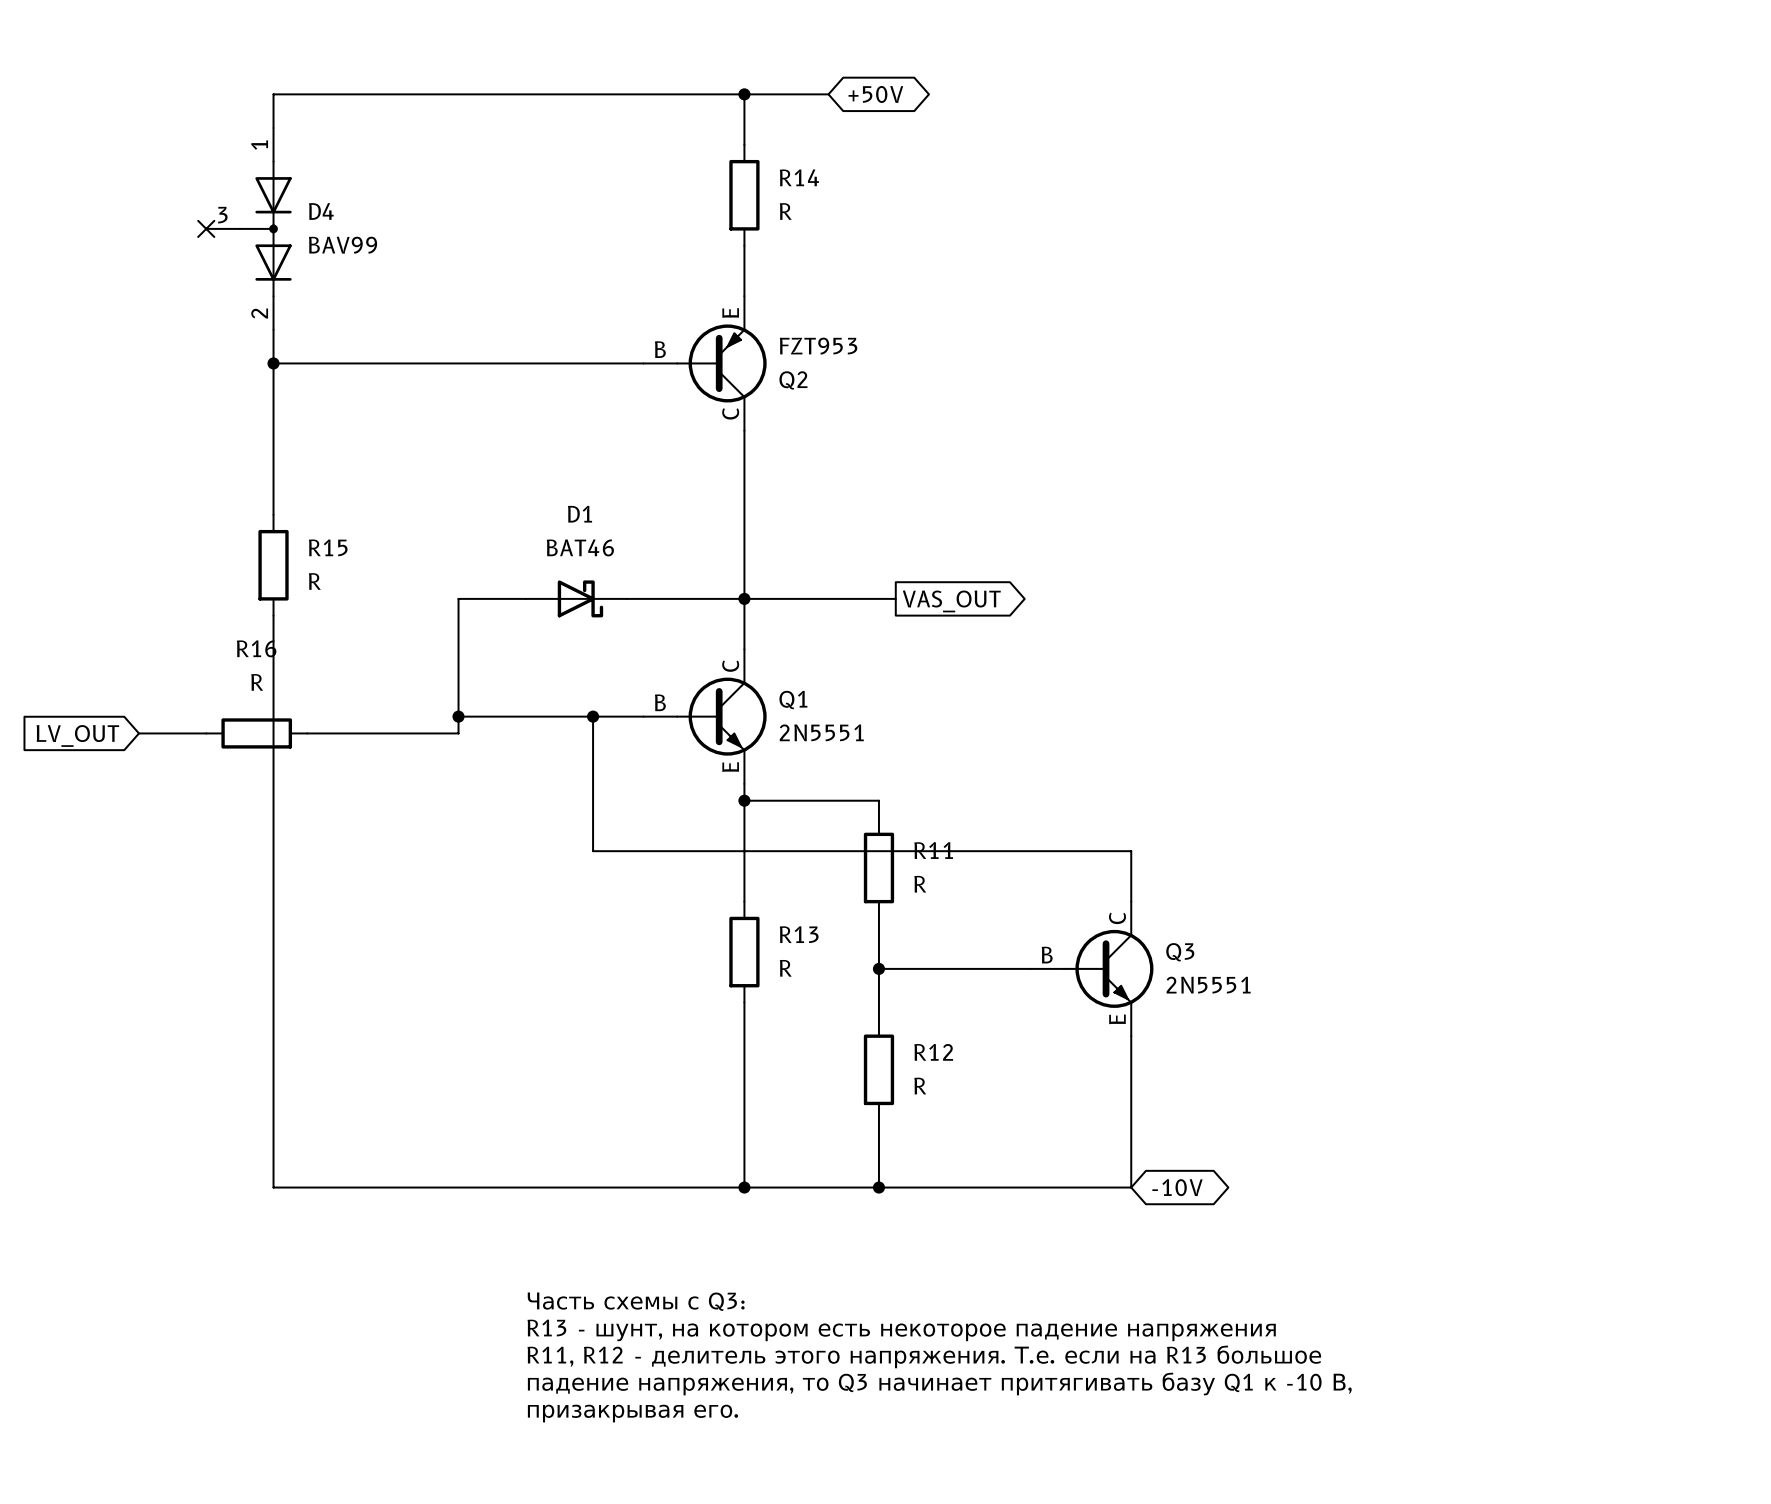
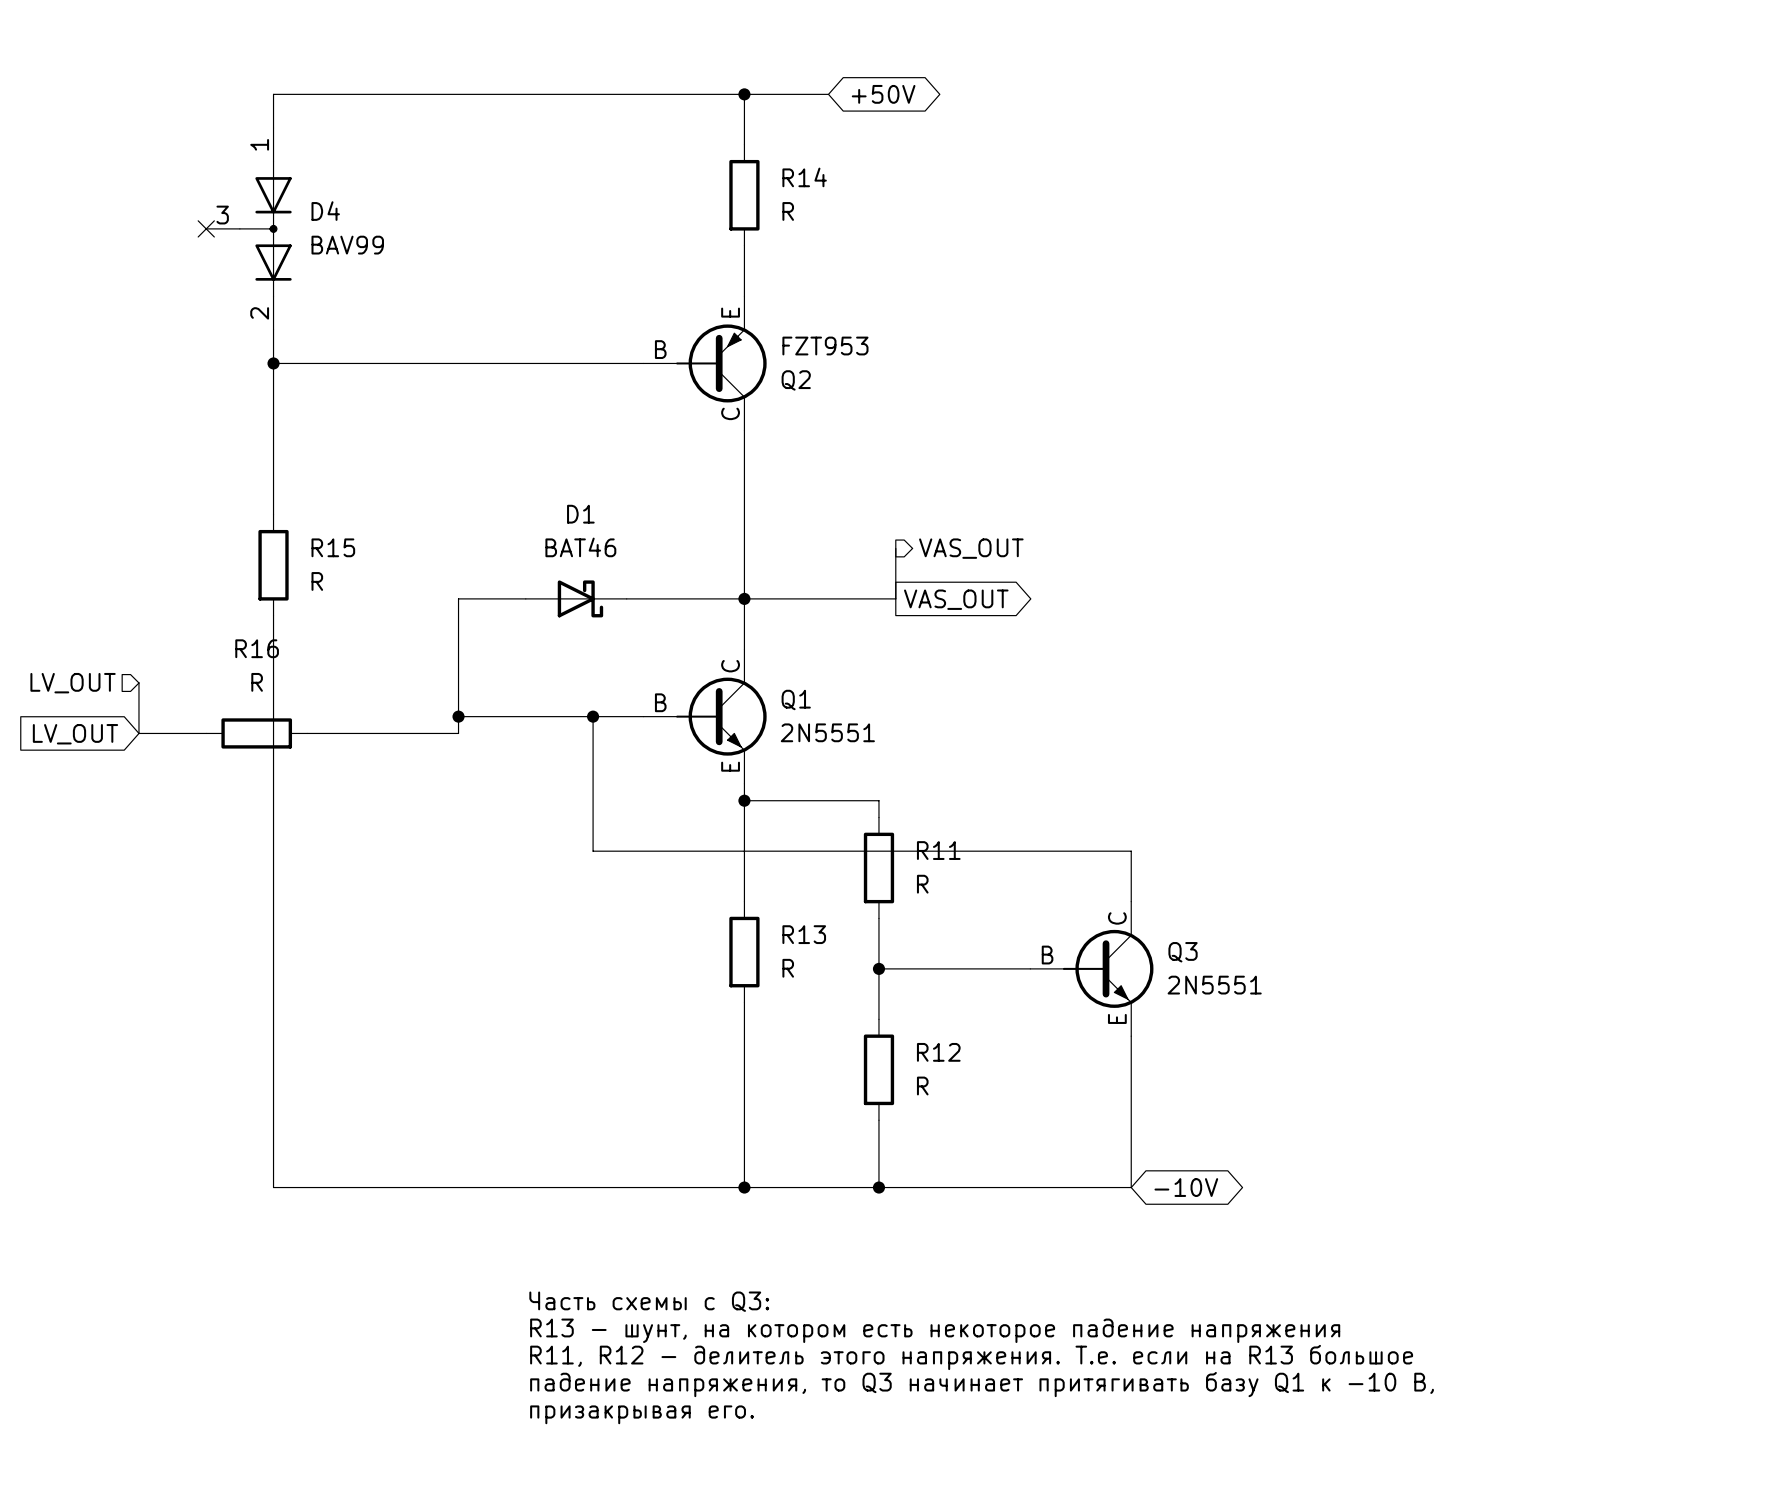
wire: none -> (895, 548) (895, 598)
hierarchical label: none -> VAS_OUT (971, 548)
wire: none -> (138, 683) (138, 733)
hierarchical label: none -> LV_OUT (73, 683)

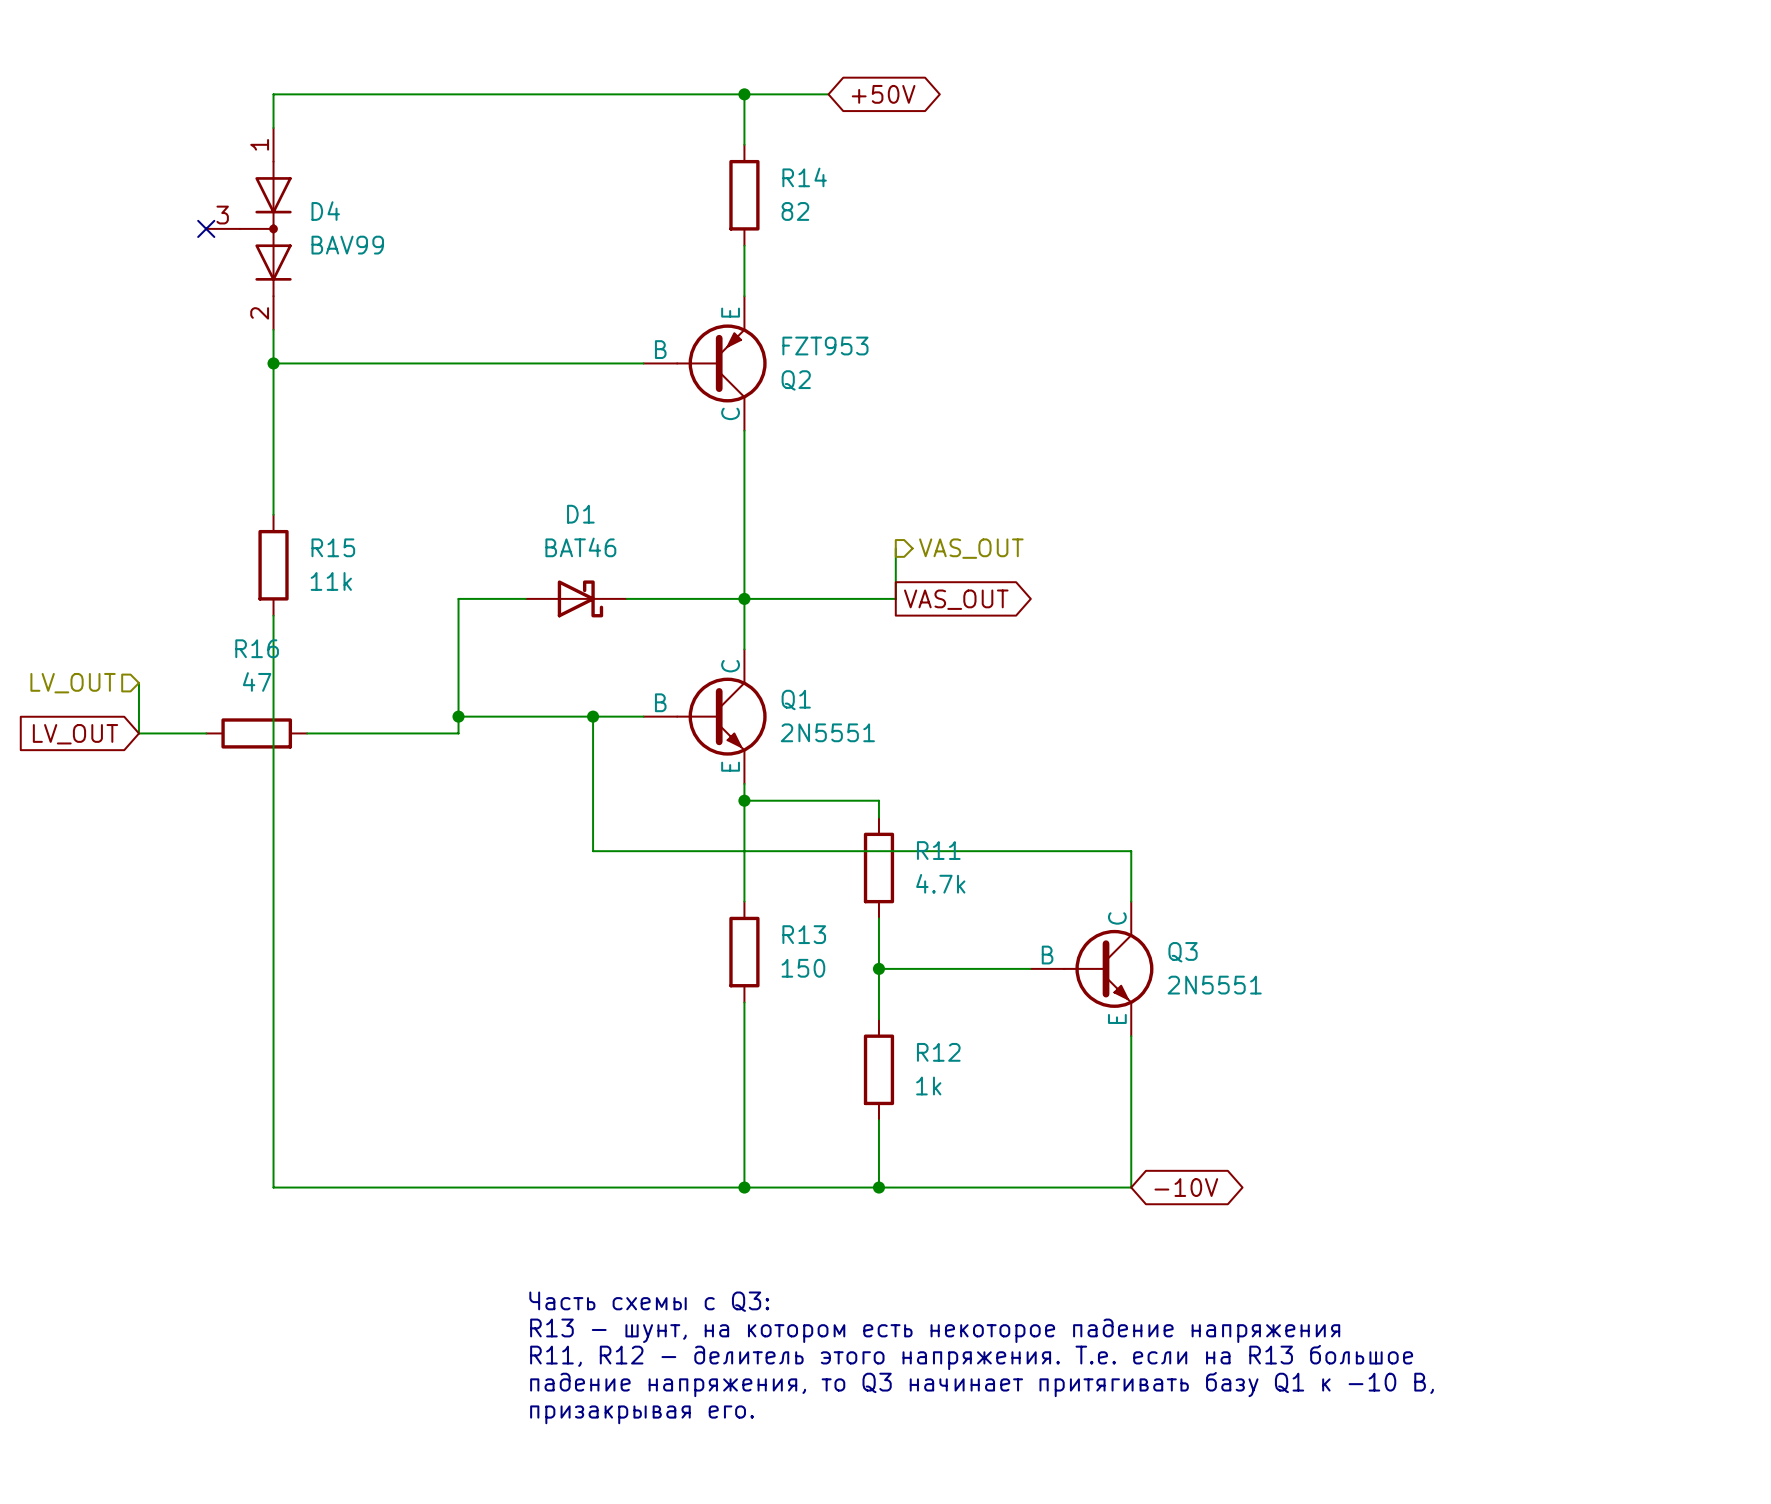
R14 value: R (788, 211) -> 82 (795, 211)
R15 value: R (317, 581) -> 11k (331, 581)
R16 value: R (257, 682) -> 47 (257, 681)
R11 value: R (922, 884) -> 4.7k (940, 883)
R13 value: R (788, 968) -> 150 (803, 968)
R12 value: R (922, 1086) -> 1k (928, 1086)

